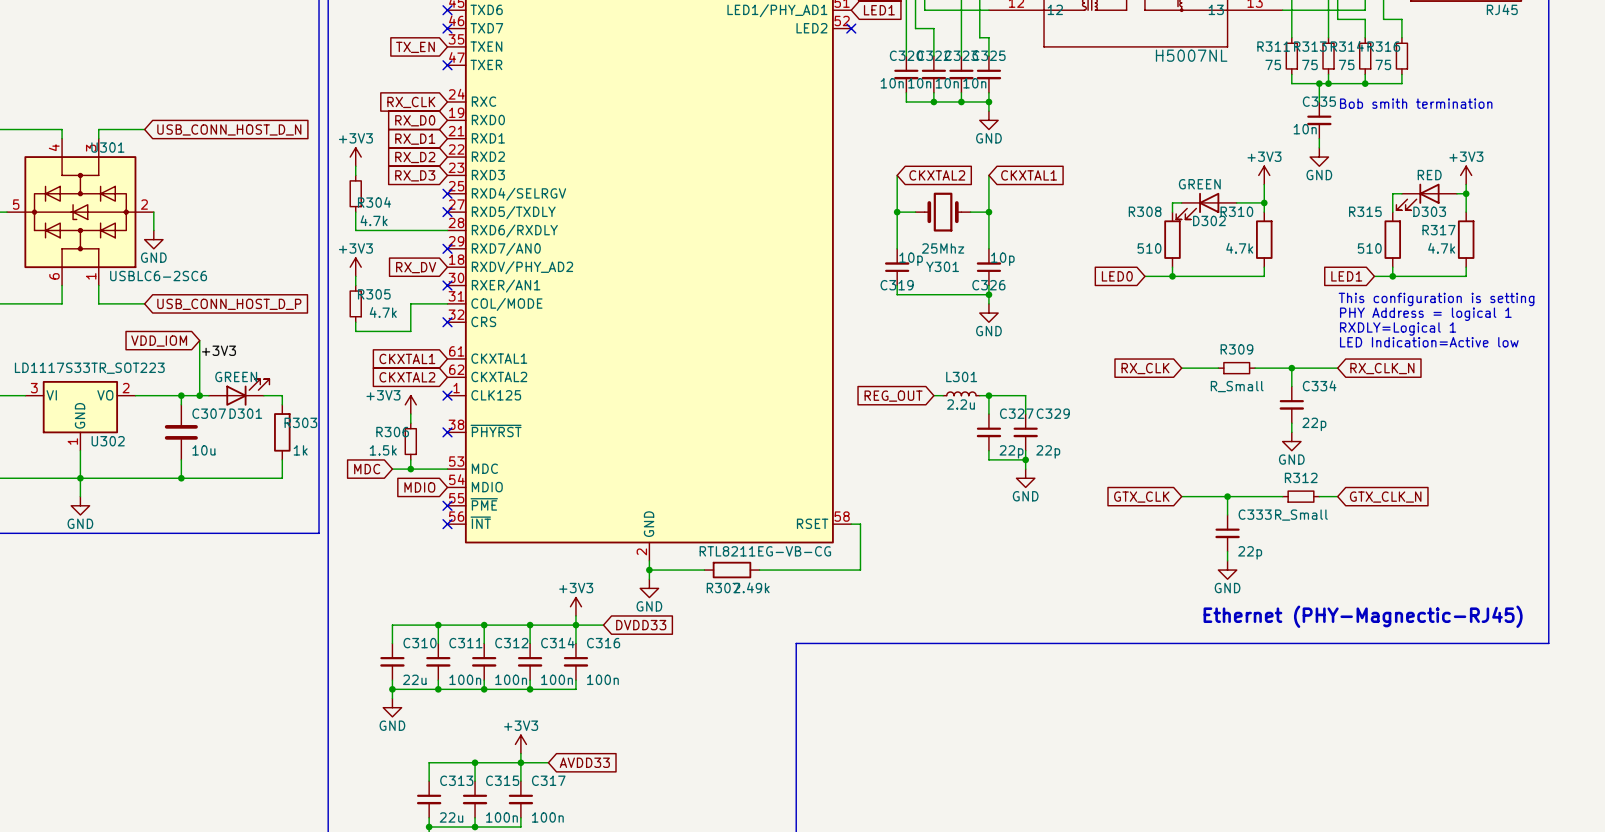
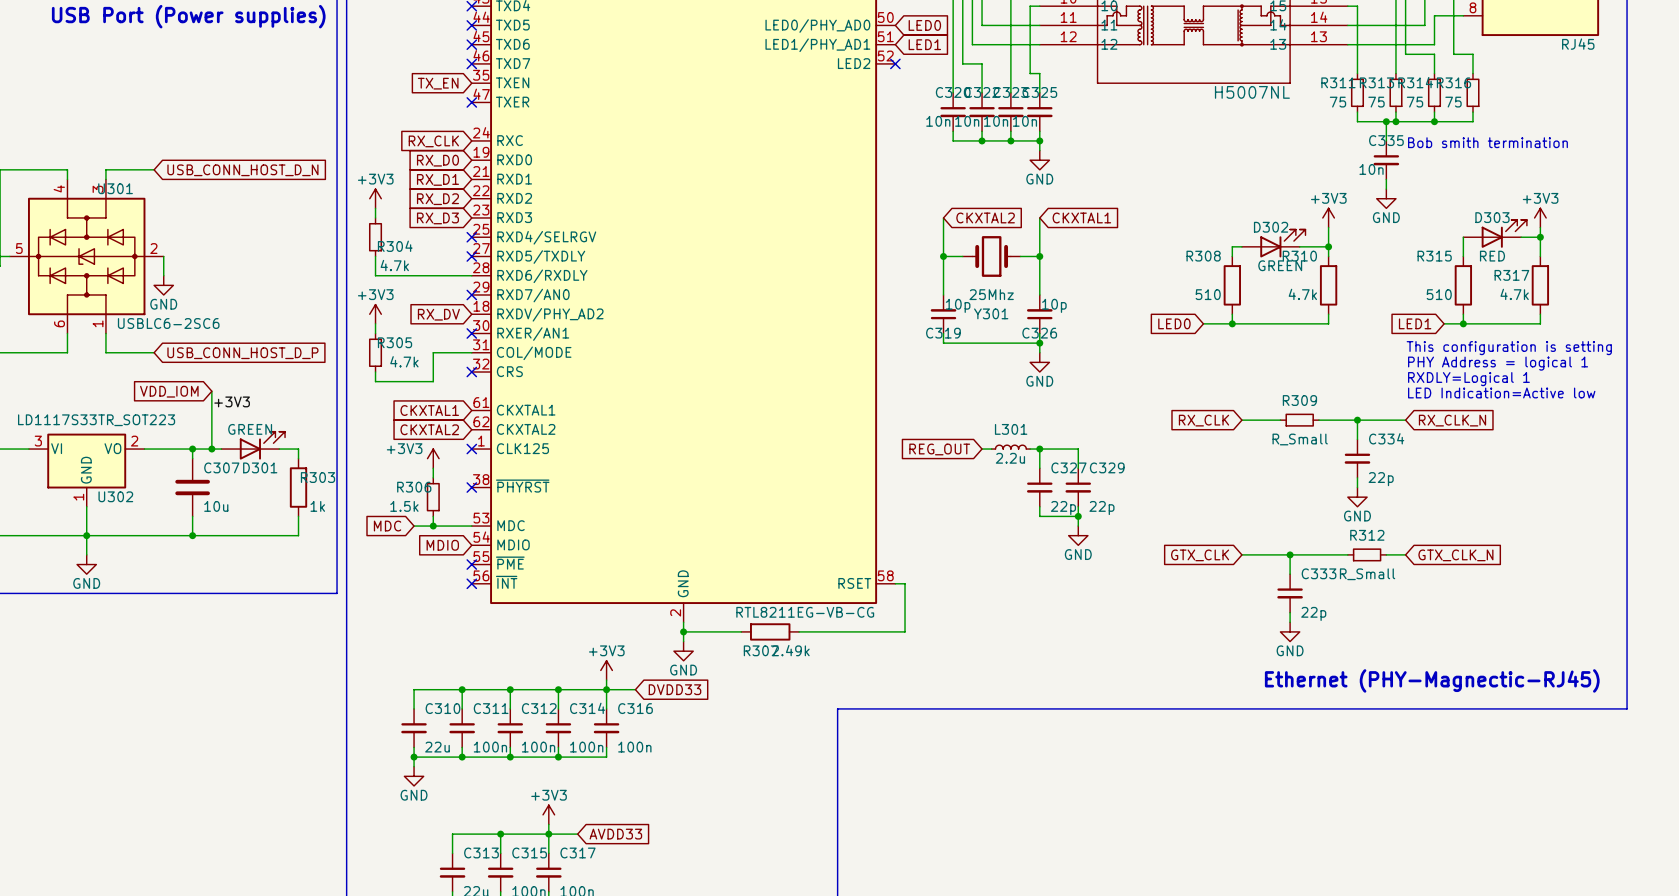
D303 rotation: 0° (1417, 196) -> 180° (1504, 233)
D302 rotation: 0° (1197, 206) -> 180° (1282, 243)

